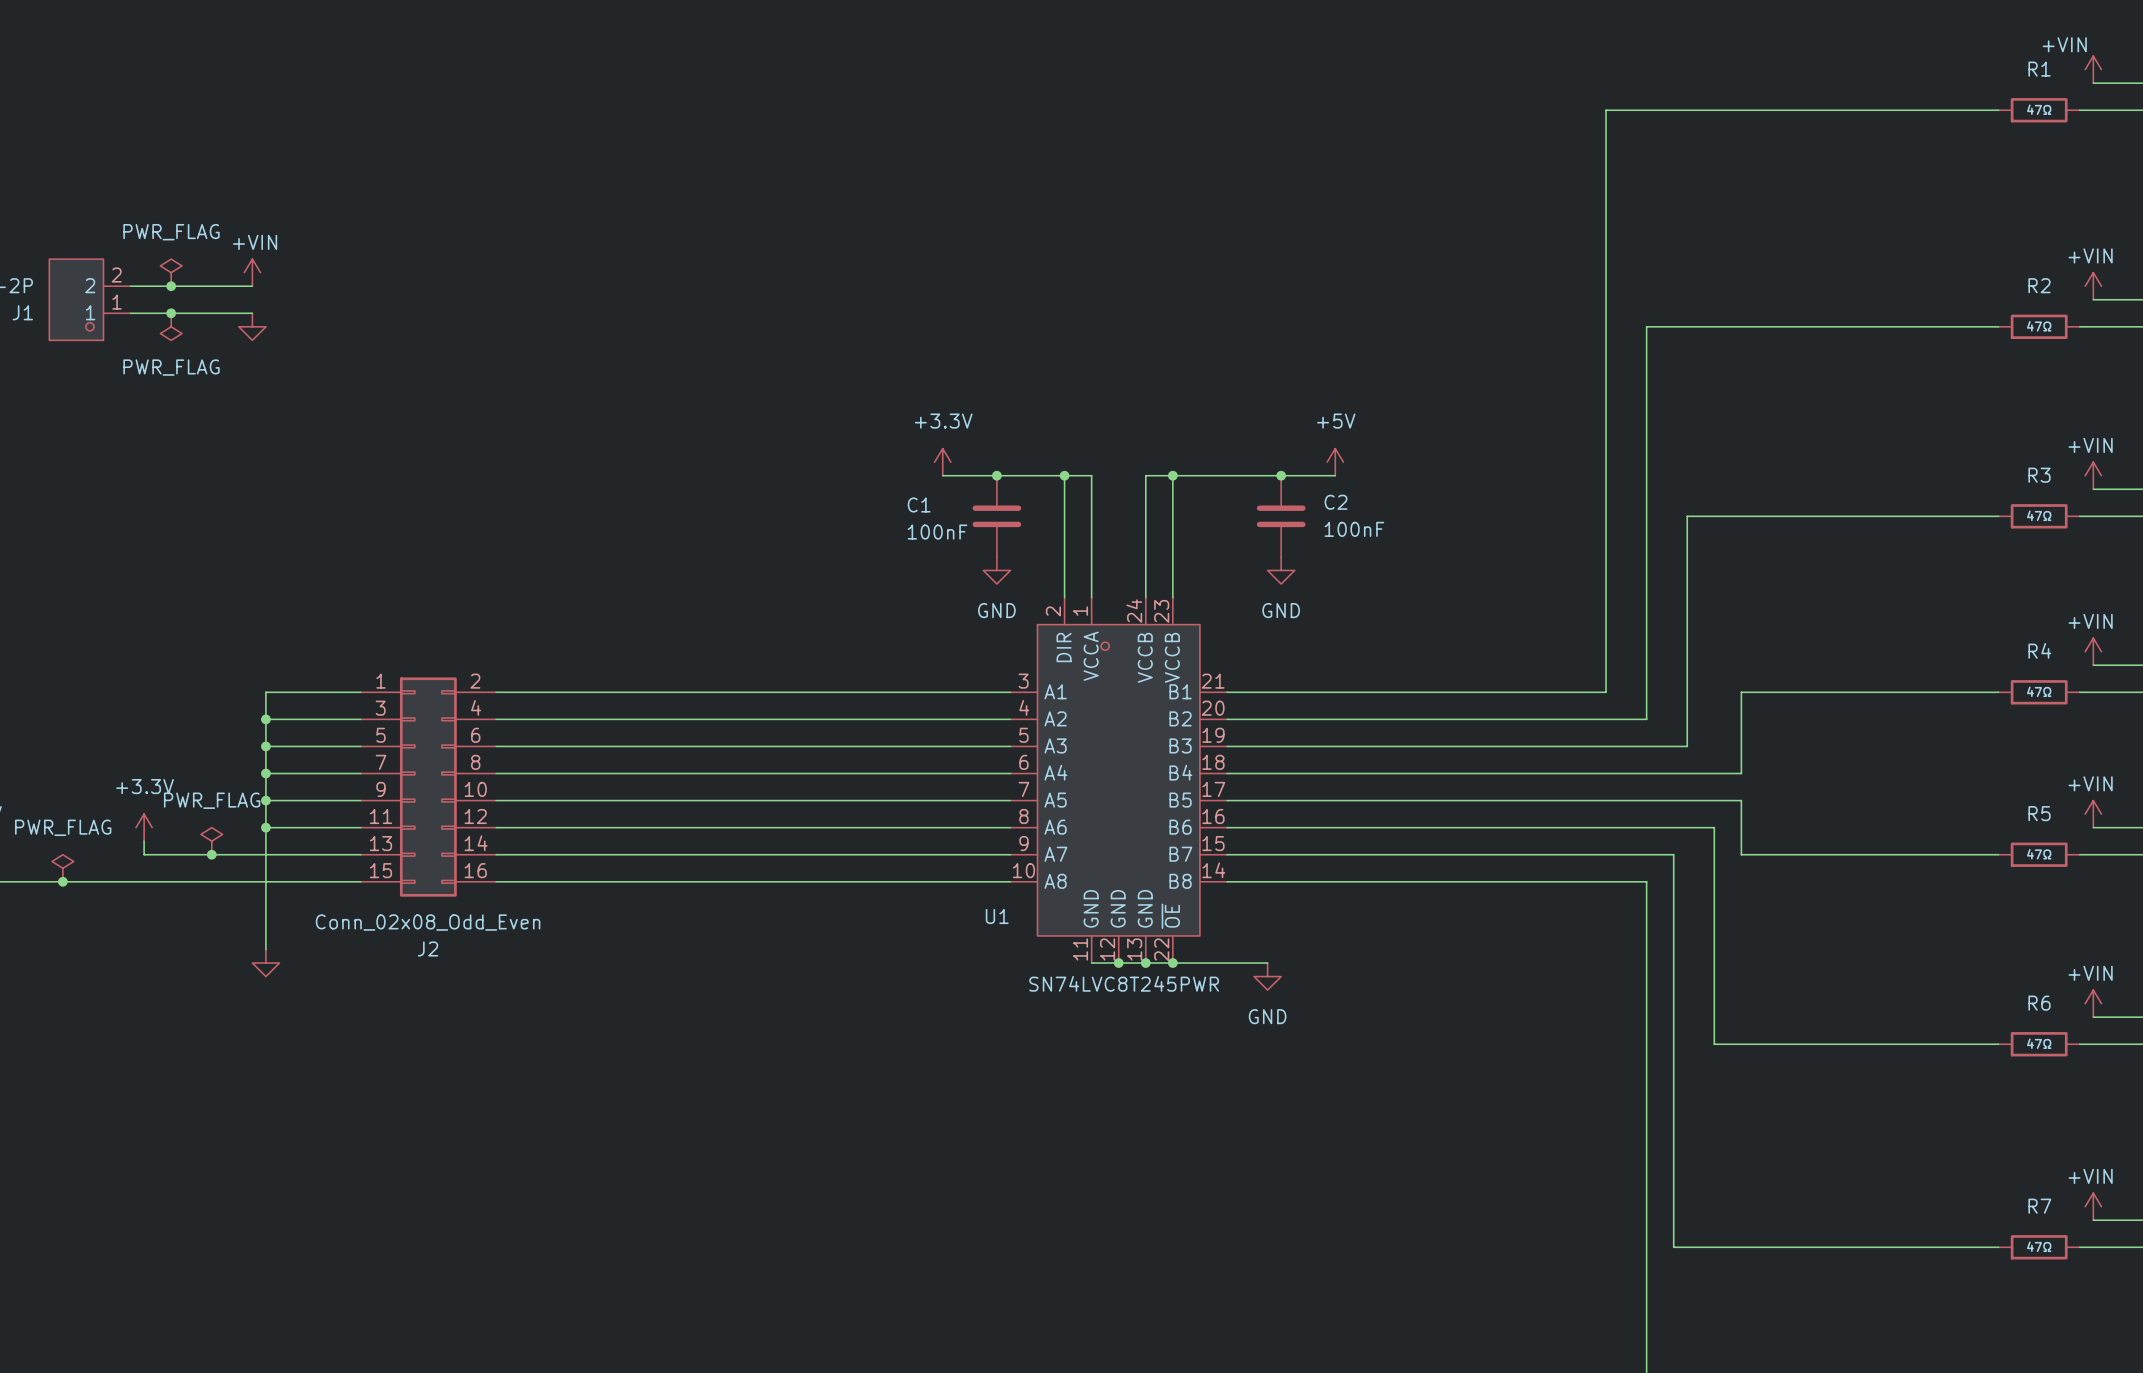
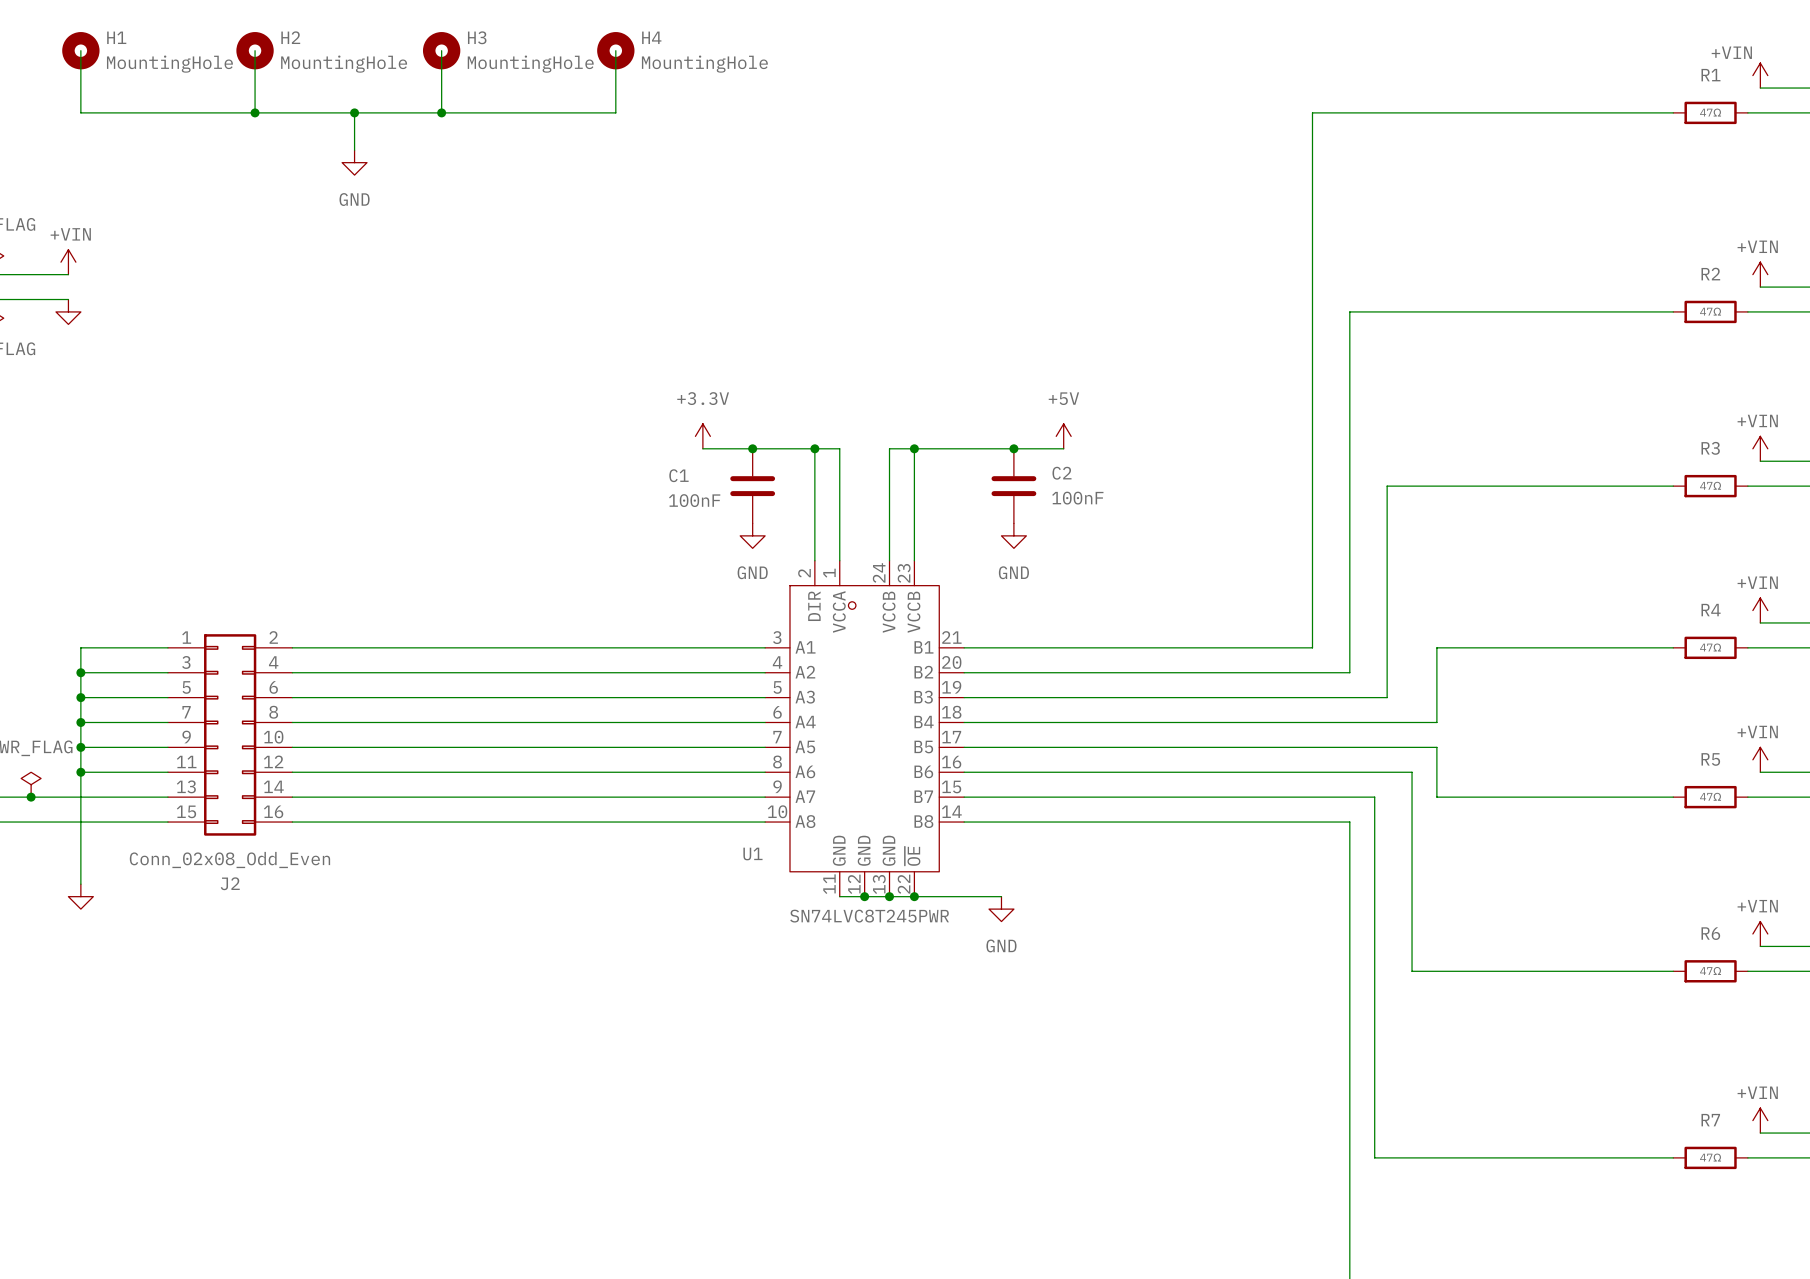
wire: none -> (80, 50) (80, 112) (615, 112) (615, 50)
H1: none -> MountingHole (80, 50)
wire: none -> (255, 50) (255, 112)
H2: none -> MountingHole (255, 50)
wire: none -> (441, 50) (441, 112)
H3: none -> MountingHole (441, 50)
H4: none -> MountingHole (615, 50)
junction: none -> (255, 112)
wire: none -> (354, 112) (354, 150)
junction: none -> (354, 112)
junction: none -> (441, 112)
power symbol: none -> GND (354, 162)

